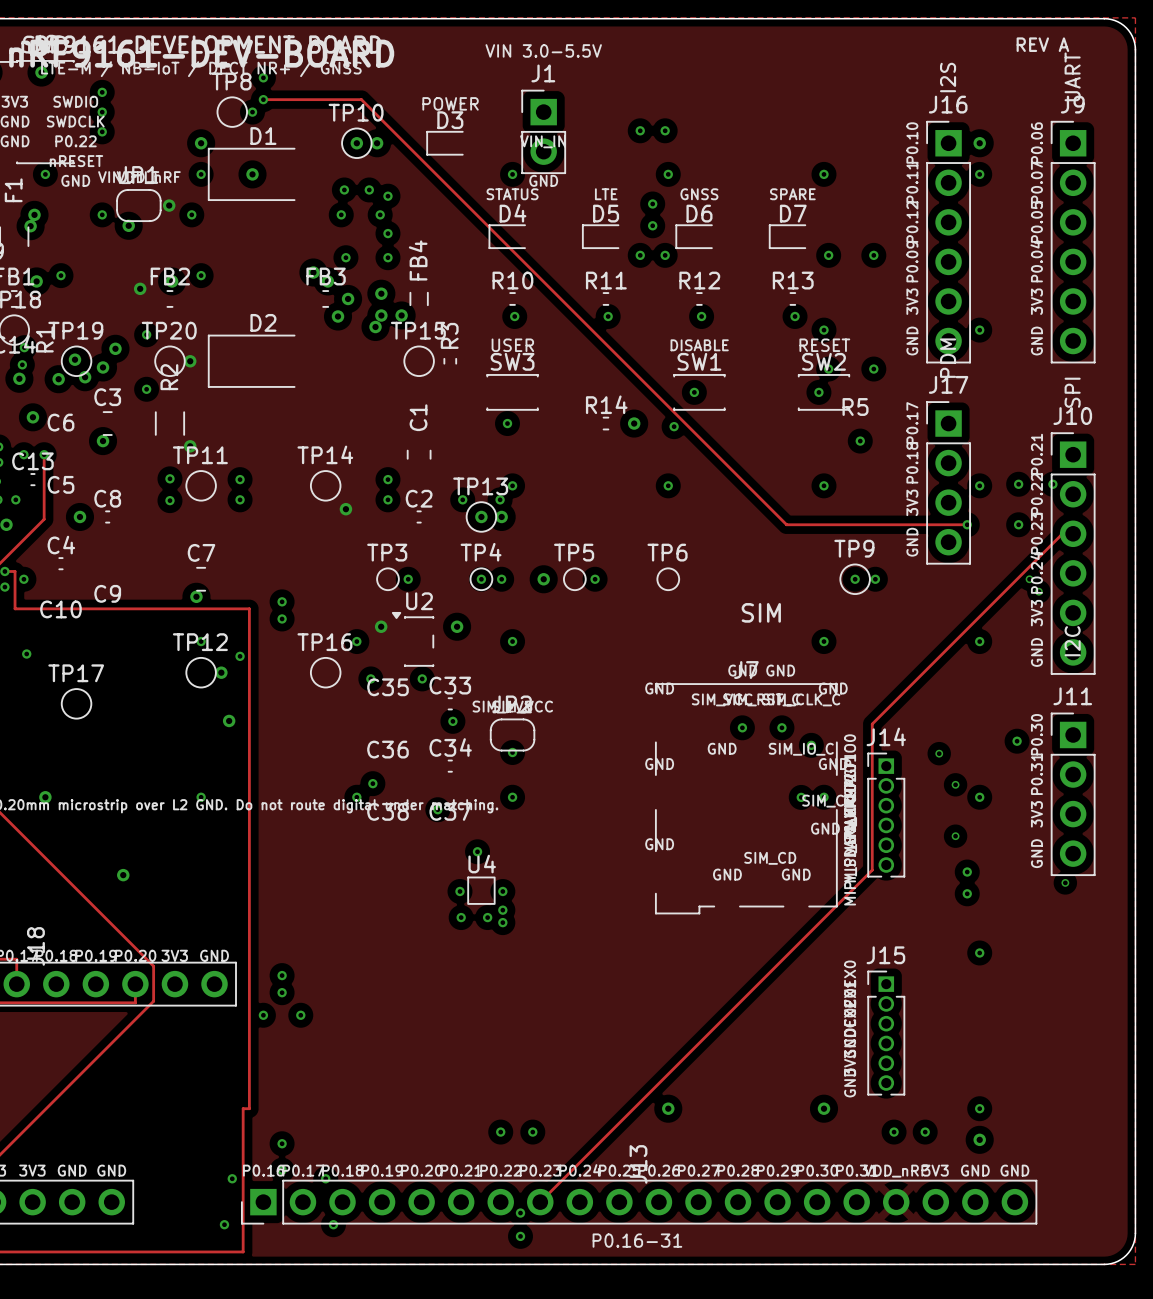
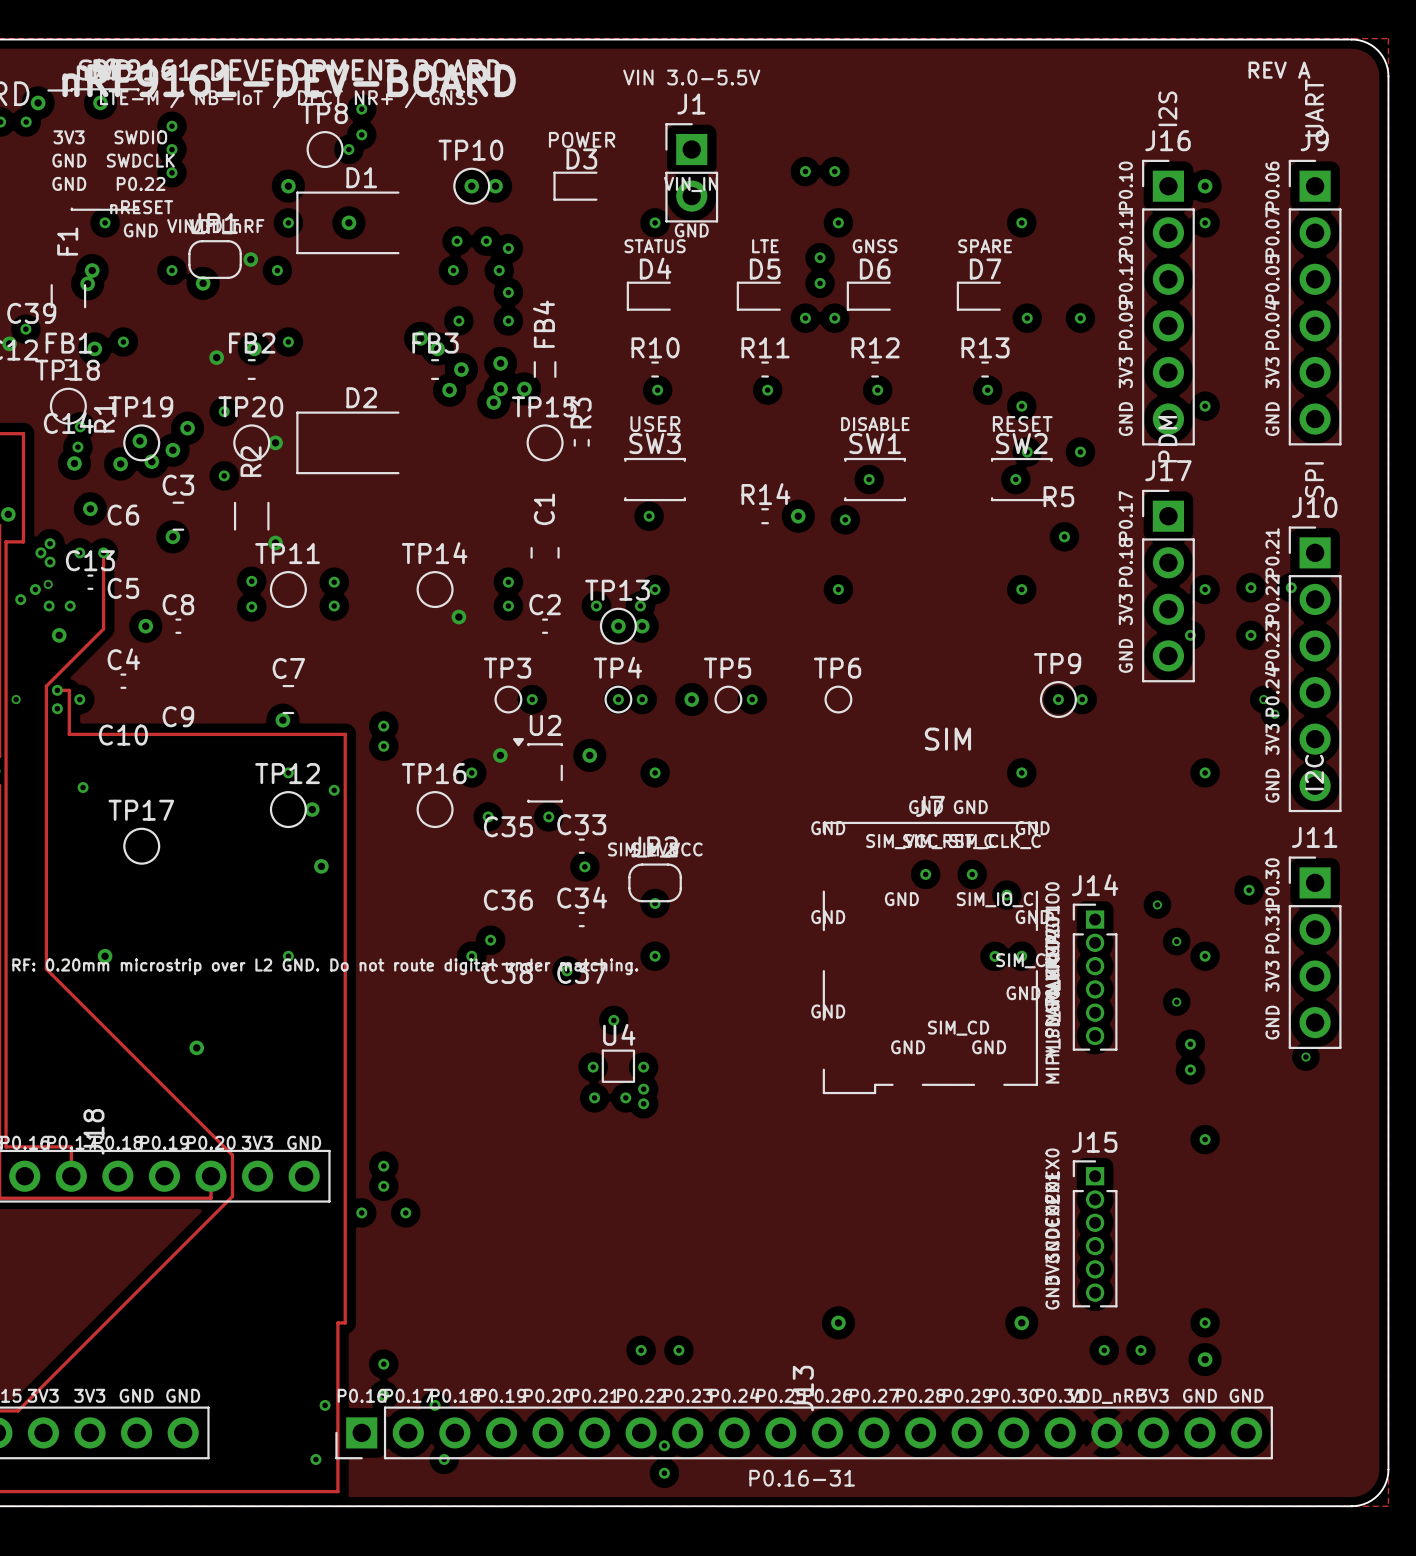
track: (263, 99) (361, 99) (786, 524) (967, 524) -> none
track: (1073, 533) (1060, 535) (872, 724) (872, 870) (540, 1202) -> none

